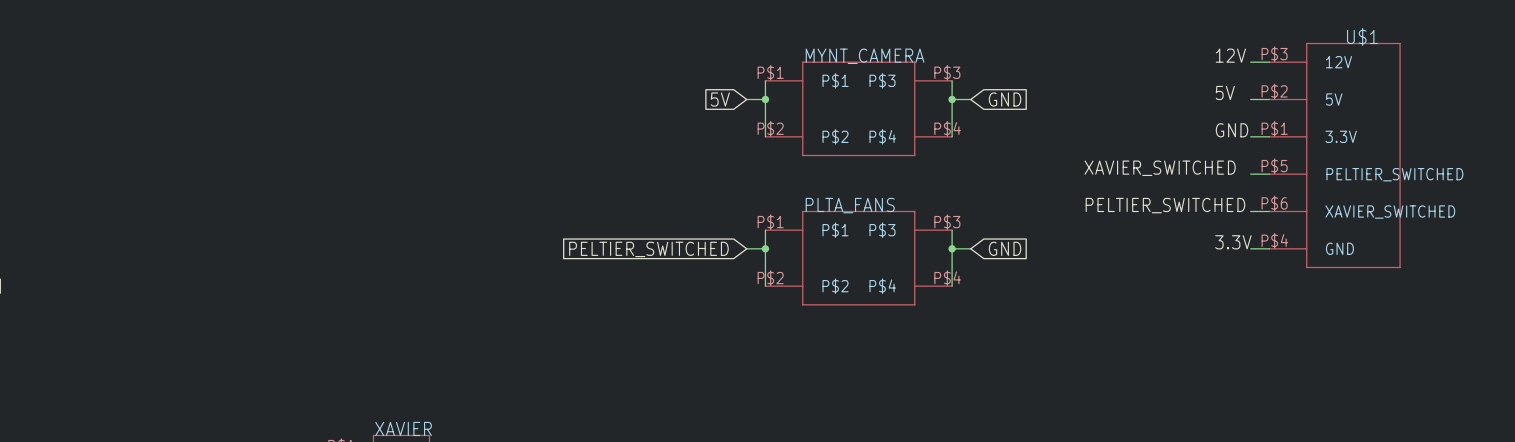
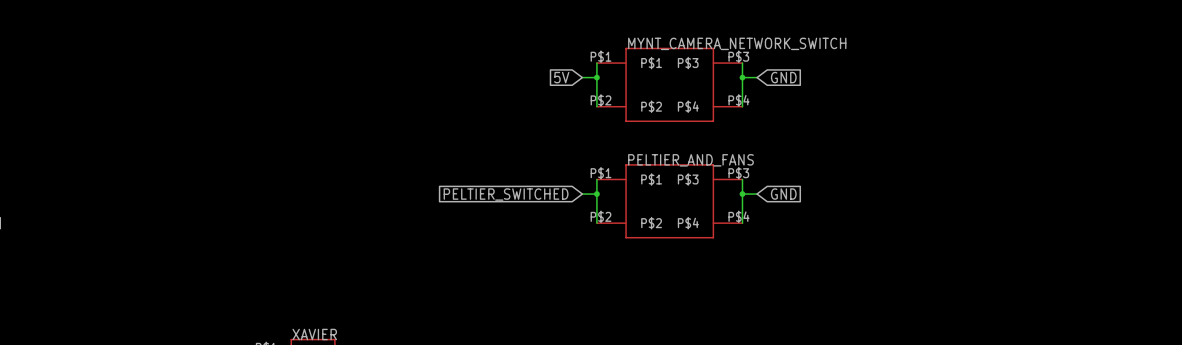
label: 12V (1230, 55) -> none
MYNT_CAMERA name: MYNT_CAMERA (865, 56) -> MYNT_CAMERA_NETWORK_SWITCH (737, 43)
wire: (1250, 62) (1269, 62) -> none
label: 5V (1225, 92) -> none
wire: (1250, 99) (1269, 99) -> none
label: GND (1232, 130) -> none
wire: (1250, 136) (1269, 136) -> none
U$1: (1335, 155) -> none
label: XAVIER_SWITCHED (1160, 168) -> none
wire: (1250, 174) (1269, 174) -> none
PLTA_FANS name: PLTA_FANS (850, 205) -> PELTIER_AND_FANS (690, 160)
label: PELTIER_SWITCHED (1165, 205) -> none
wire: (1250, 211) (1269, 211) -> none
label: 3.3V (1233, 242) -> none
wire: (1250, 248) (1269, 248) -> none

